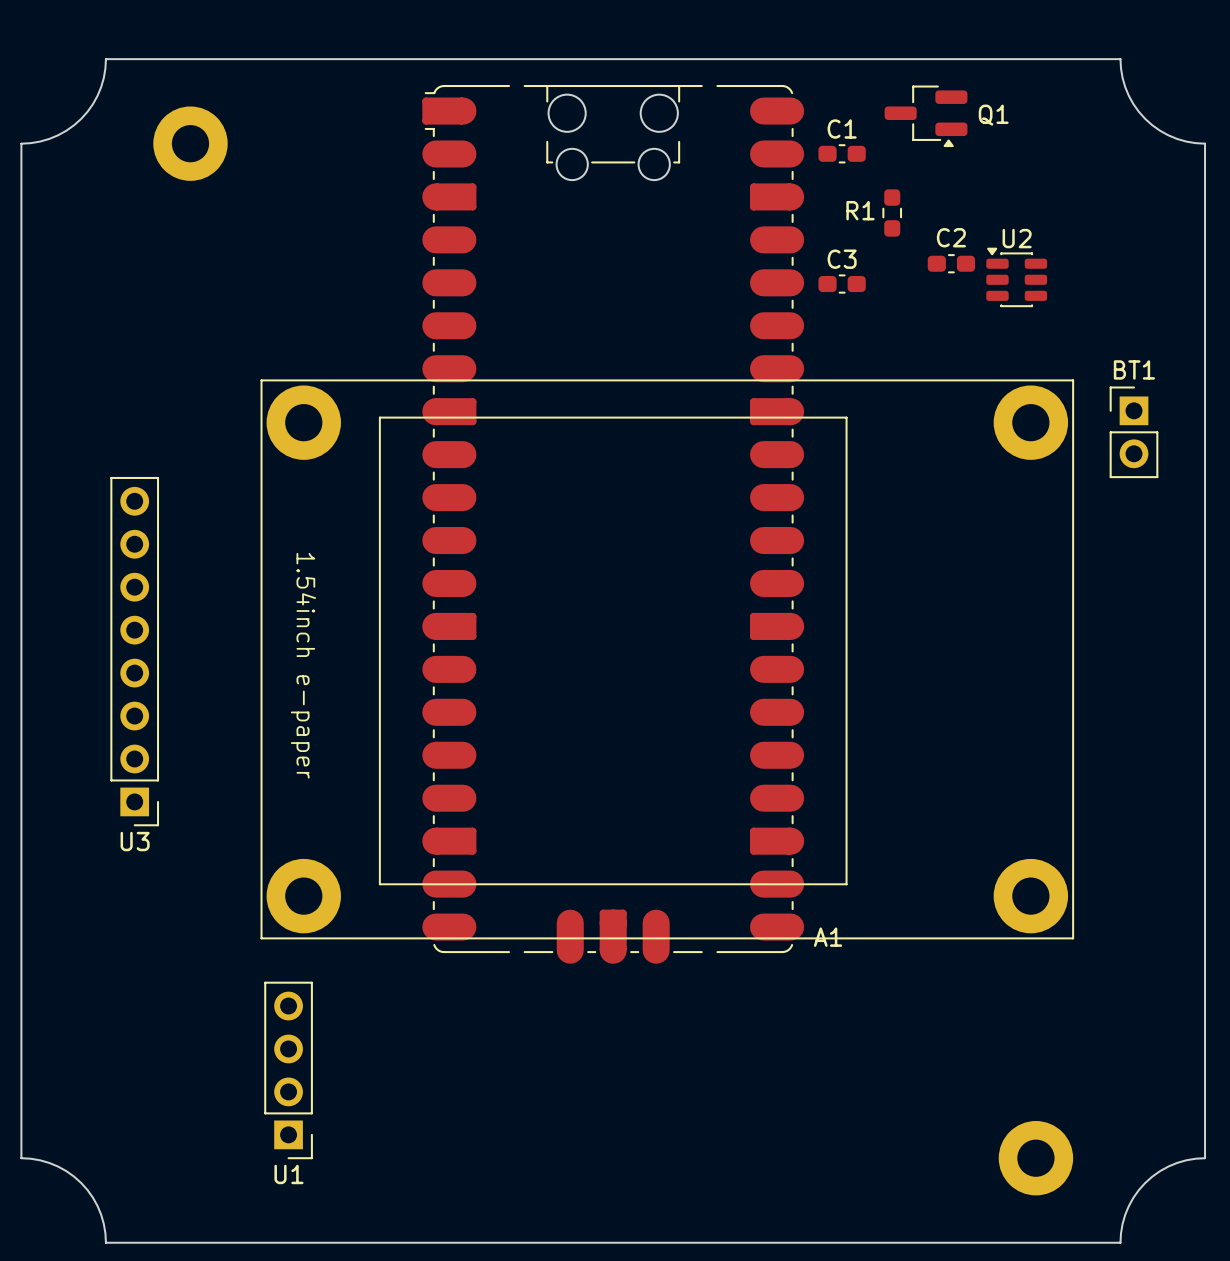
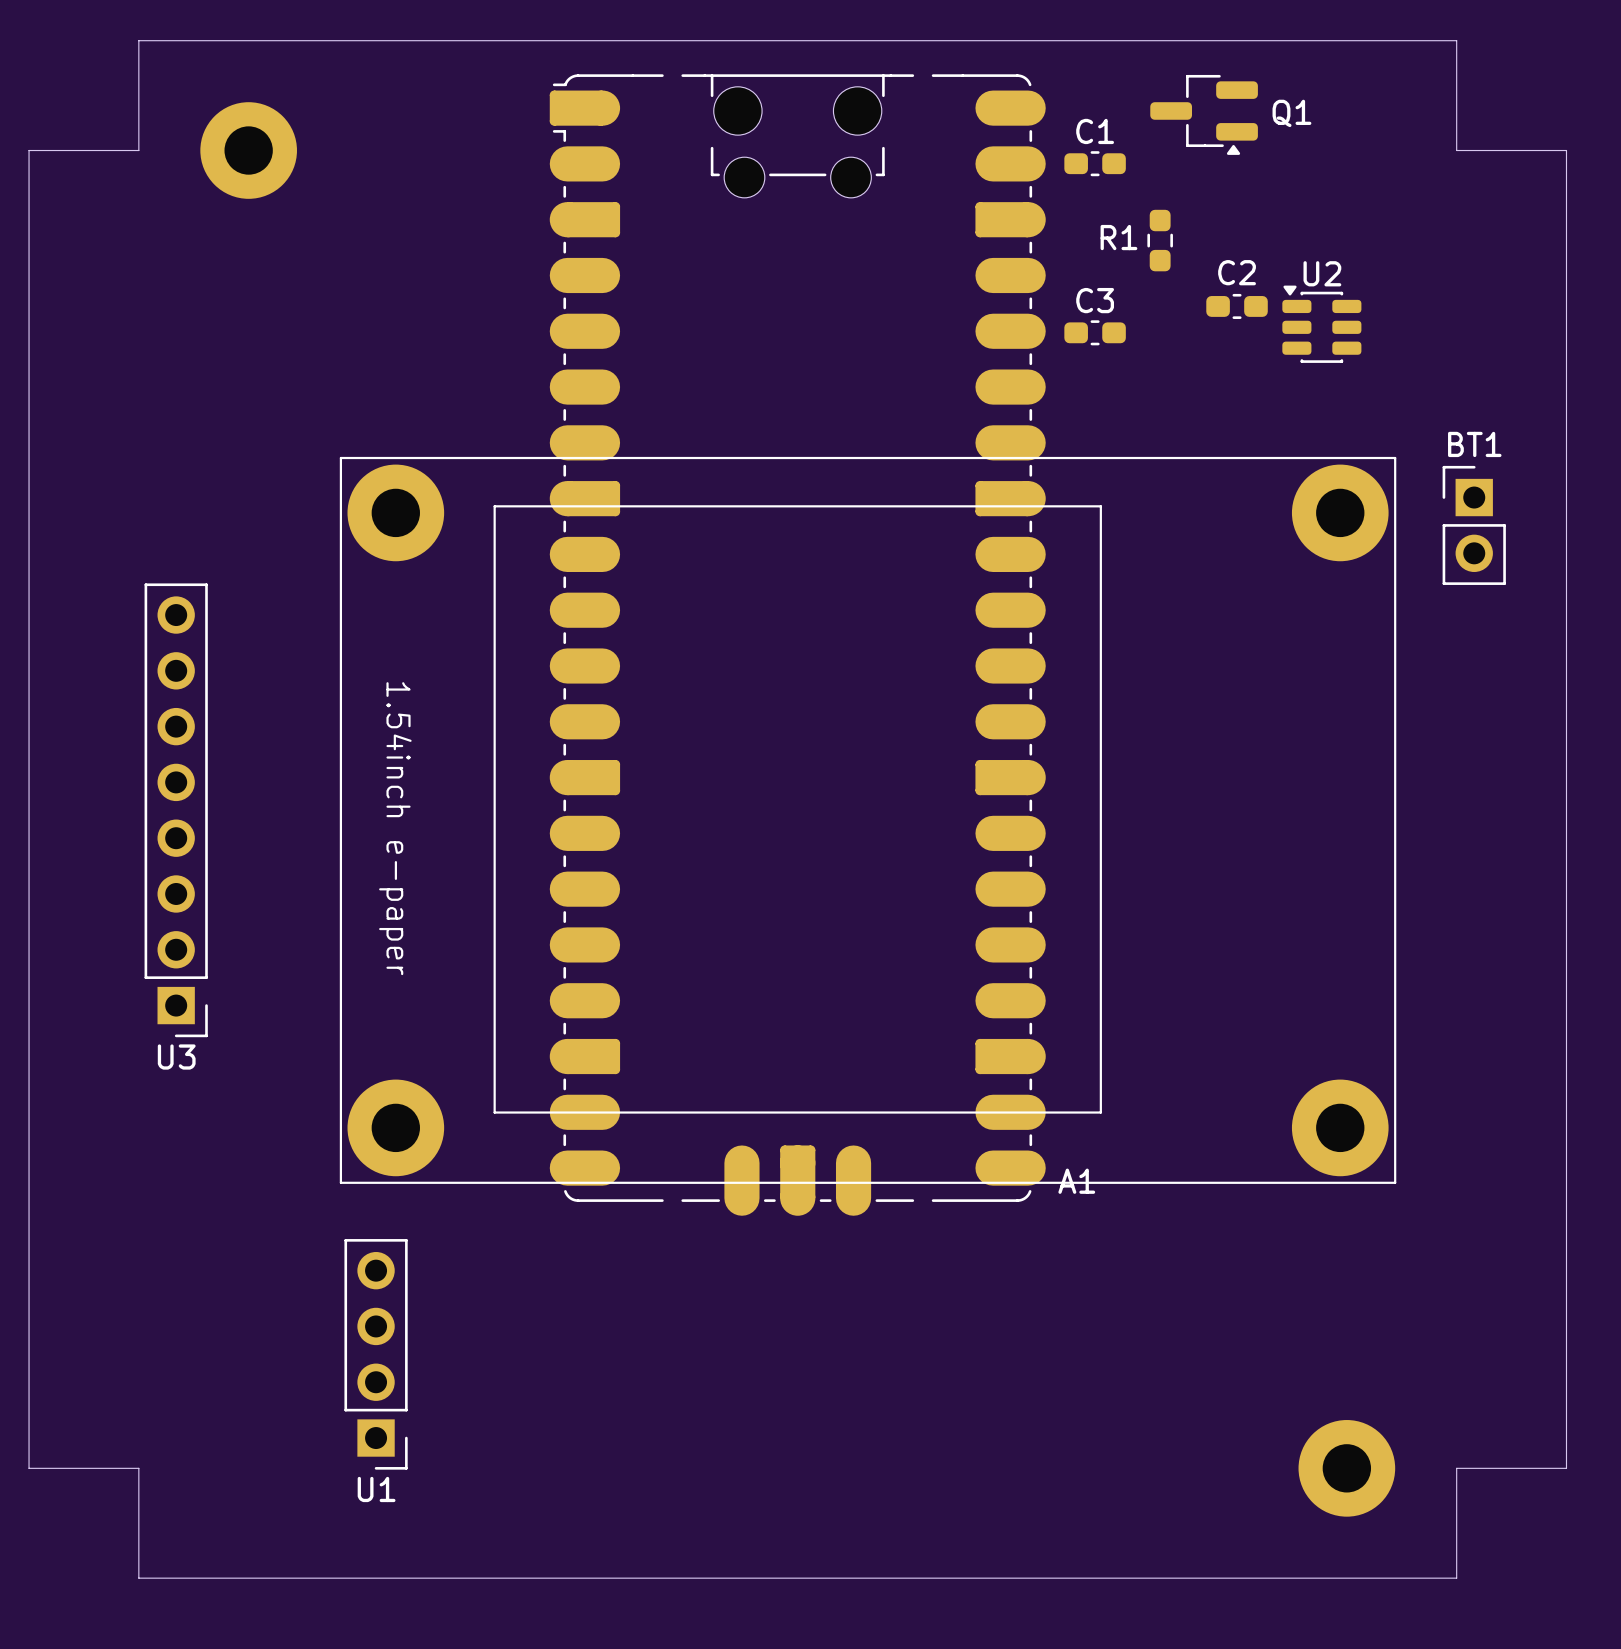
board edge: (105, 59) (101, 87) (92, 104) (81, 118) (66, 130) (49, 138) (21, 143) -> (138, 40) (138, 150) (29, 150)
board edge: (1120, 59) (1122, 77) (1128, 95) (1145, 118) (1160, 130) (1177, 138) (1205, 143) -> (1456, 40) (1456, 150) (1566, 150)
board edge: (21, 1158) (40, 1160) (58, 1166) (81, 1182) (97, 1206) (103, 1223) (105, 1242) -> (29, 1468) (138, 1468) (138, 1578)
board edge: (1205, 1158) (1177, 1162) (1160, 1171) (1145, 1182) (1133, 1197) (1125, 1214) (1120, 1242) -> (1566, 1468) (1456, 1468) (1456, 1578)

